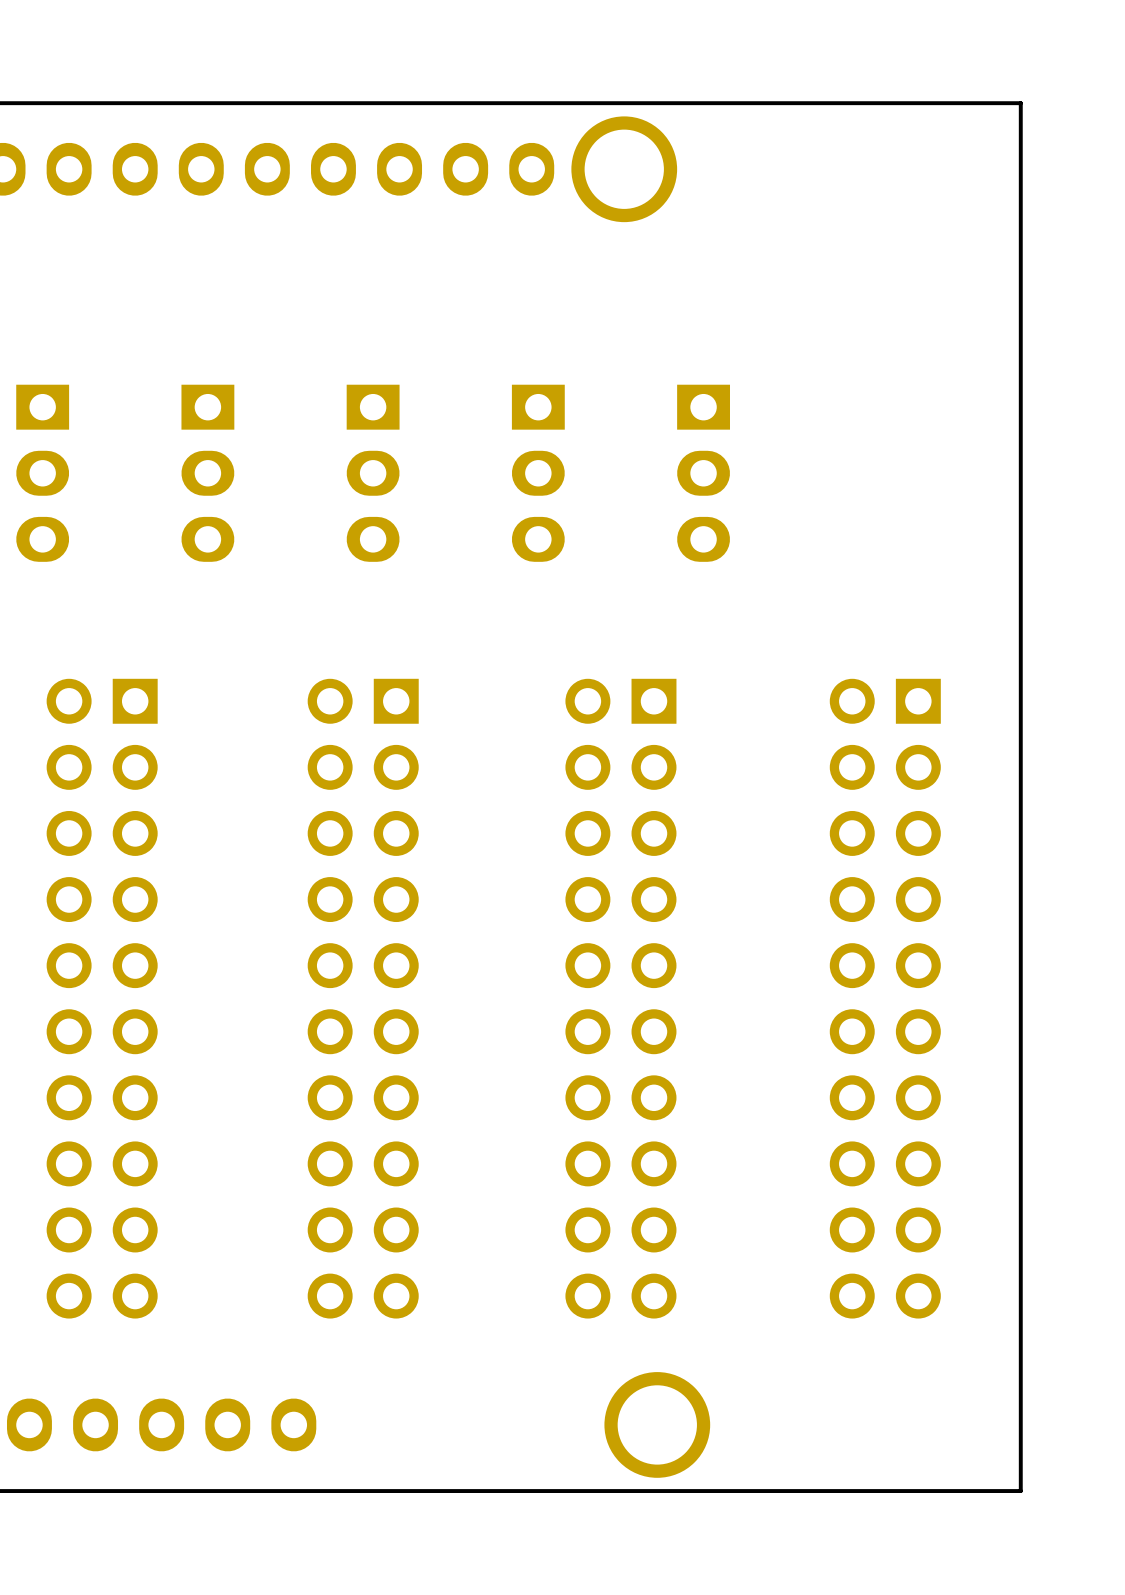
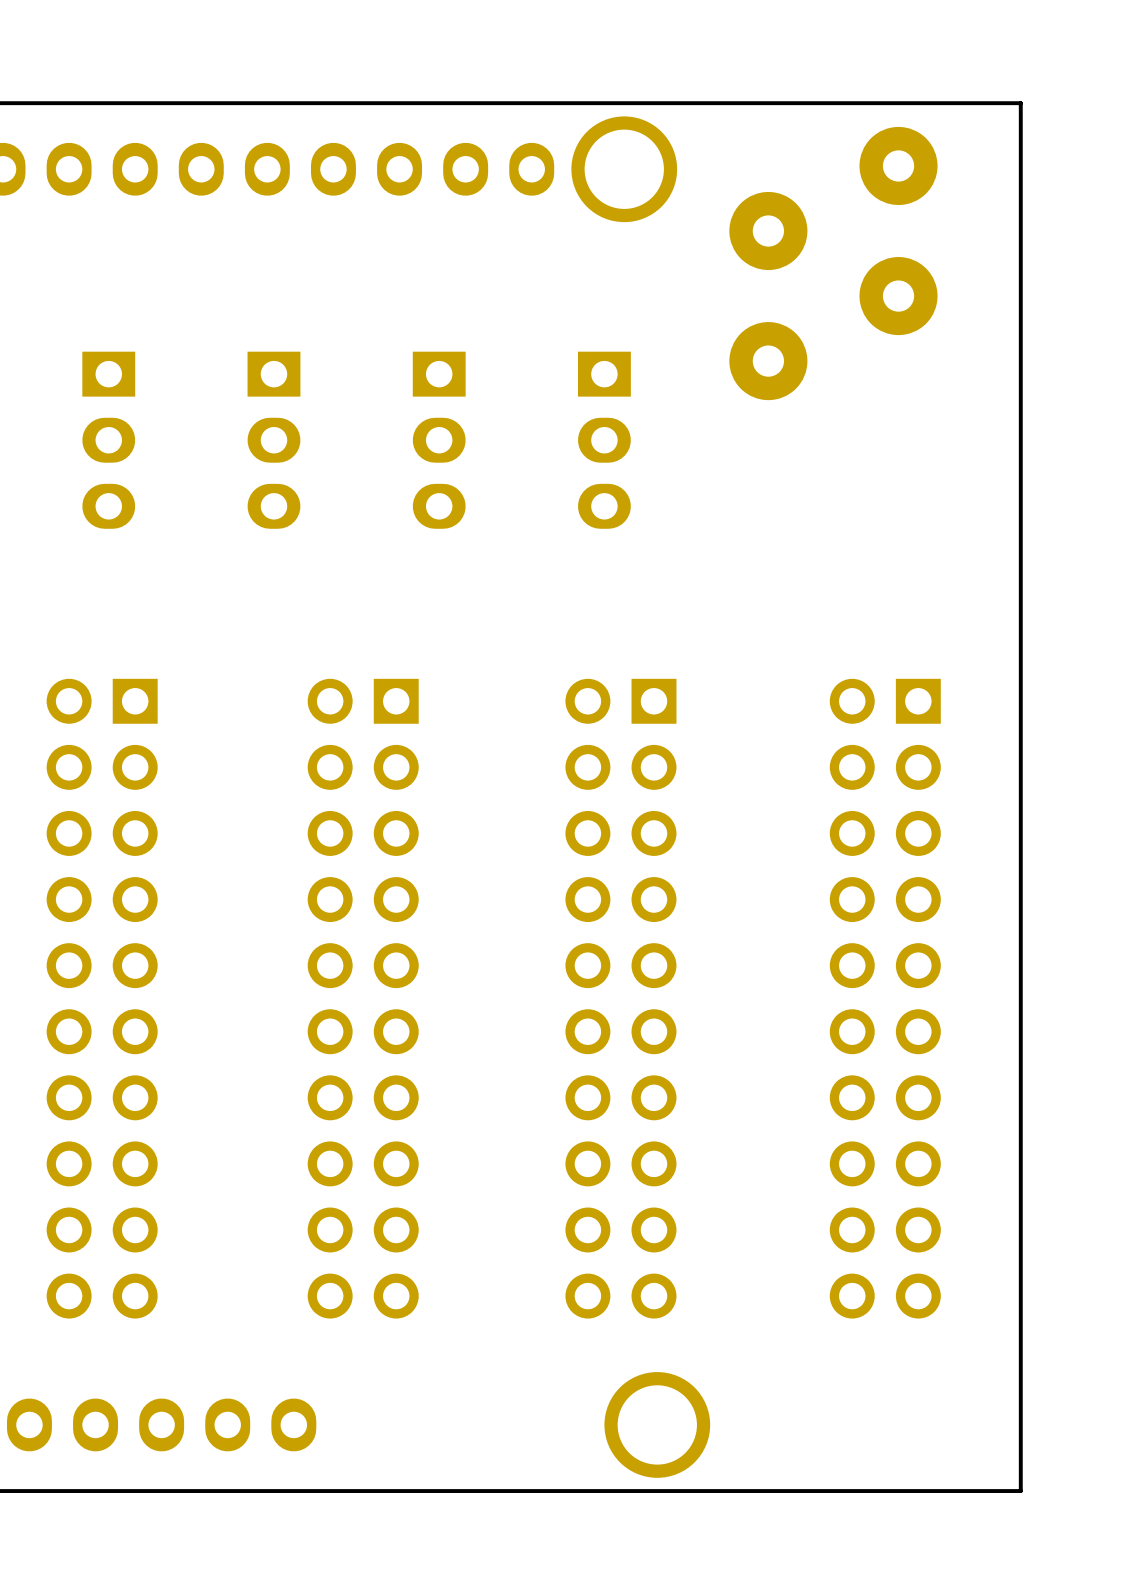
part: none -> (833, 263)
part: none -> (108, 440)
part: none -> (273, 440)
part: none -> (439, 440)
part: none -> (604, 440)
part: (42, 473) -> none
part: (207, 473) -> none
part: (373, 473) -> none
part: (538, 473) -> none
part: (703, 473) -> none

